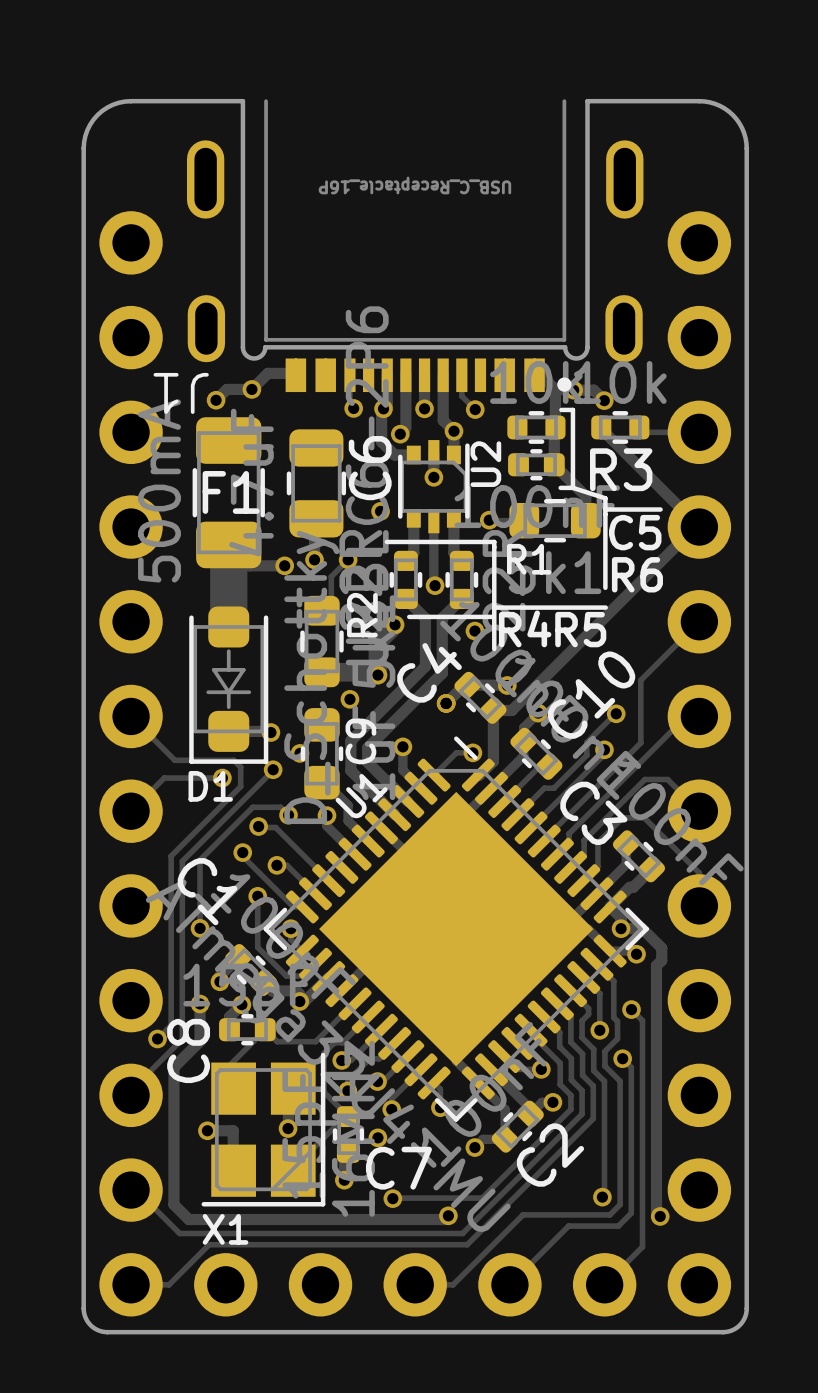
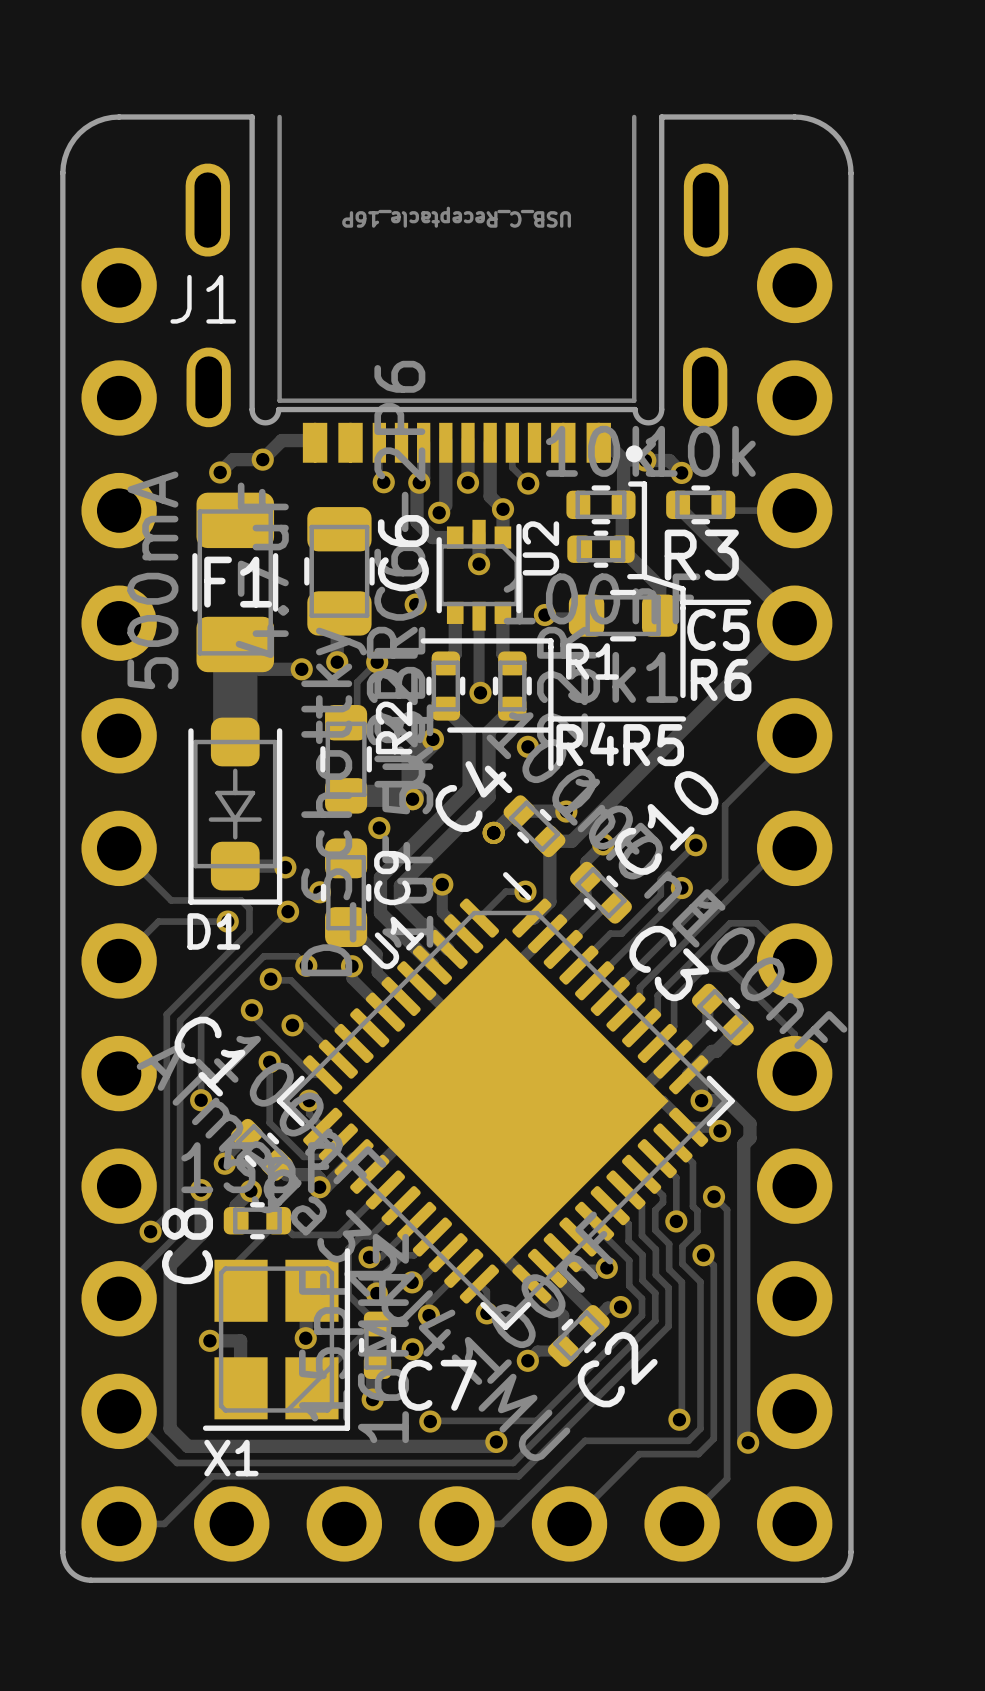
J1 name rotation: 0° (181, 393) -> 180° (203, 299)
J1 name position: J1 (181, 393) -> J1 (203, 299)

